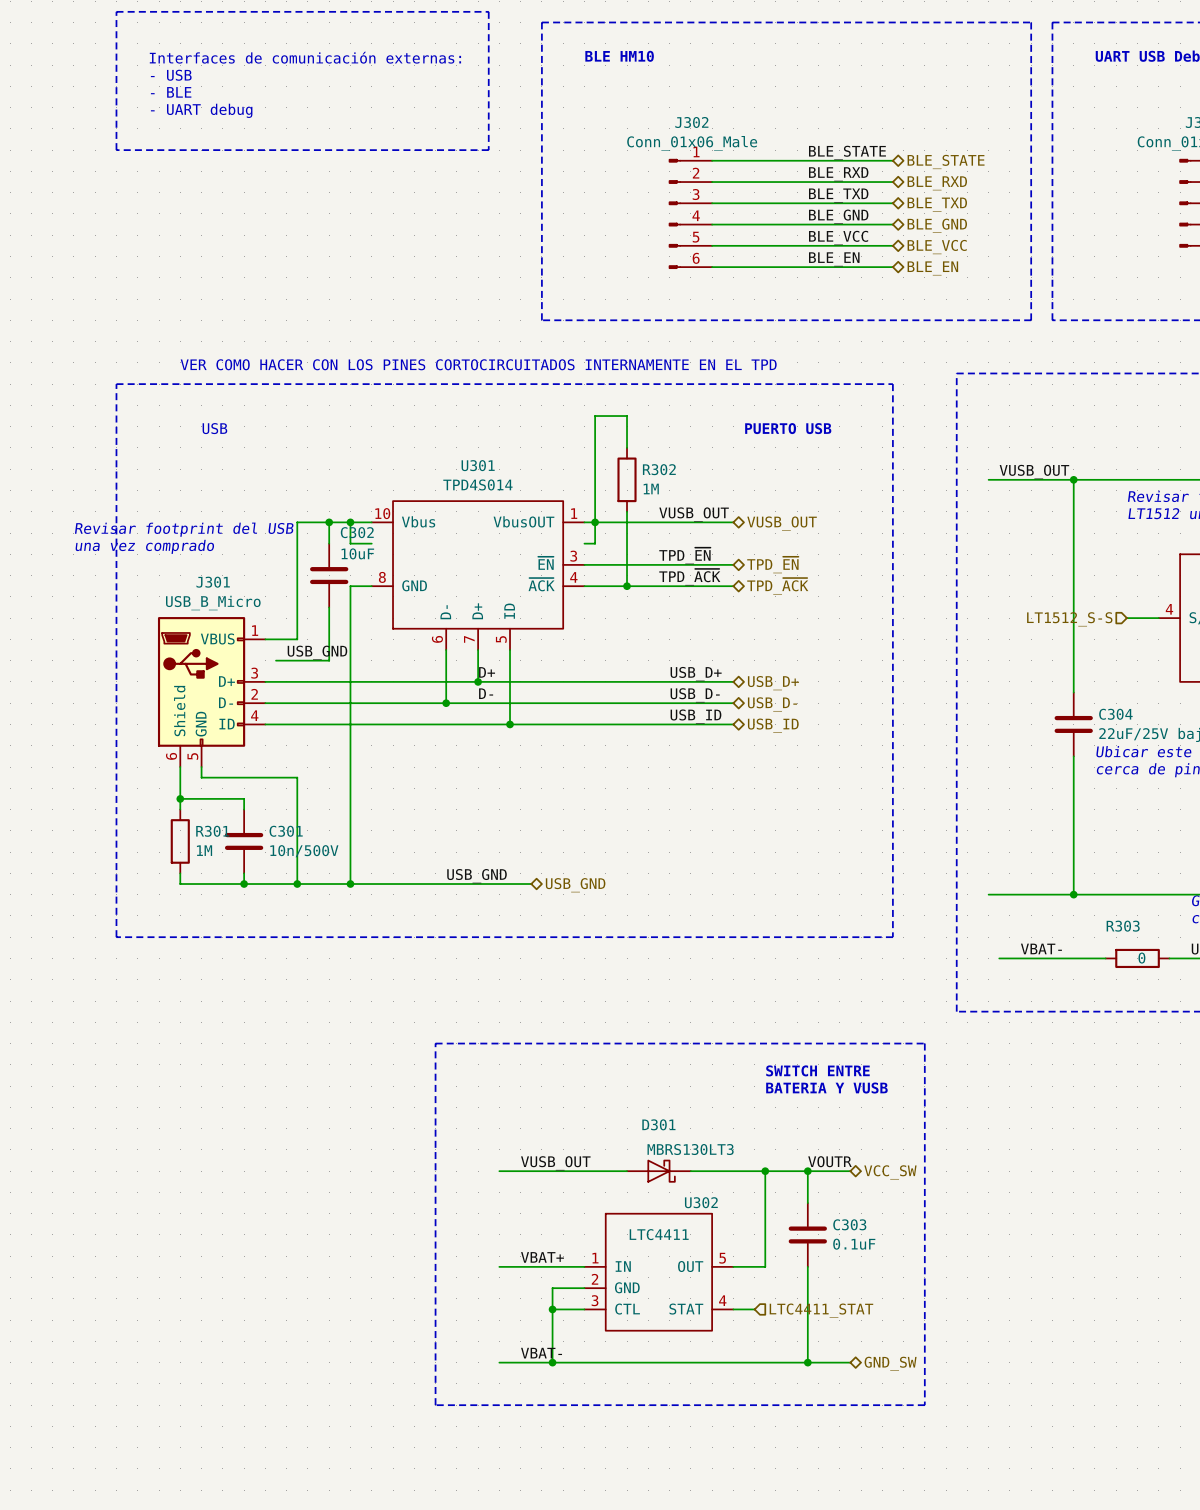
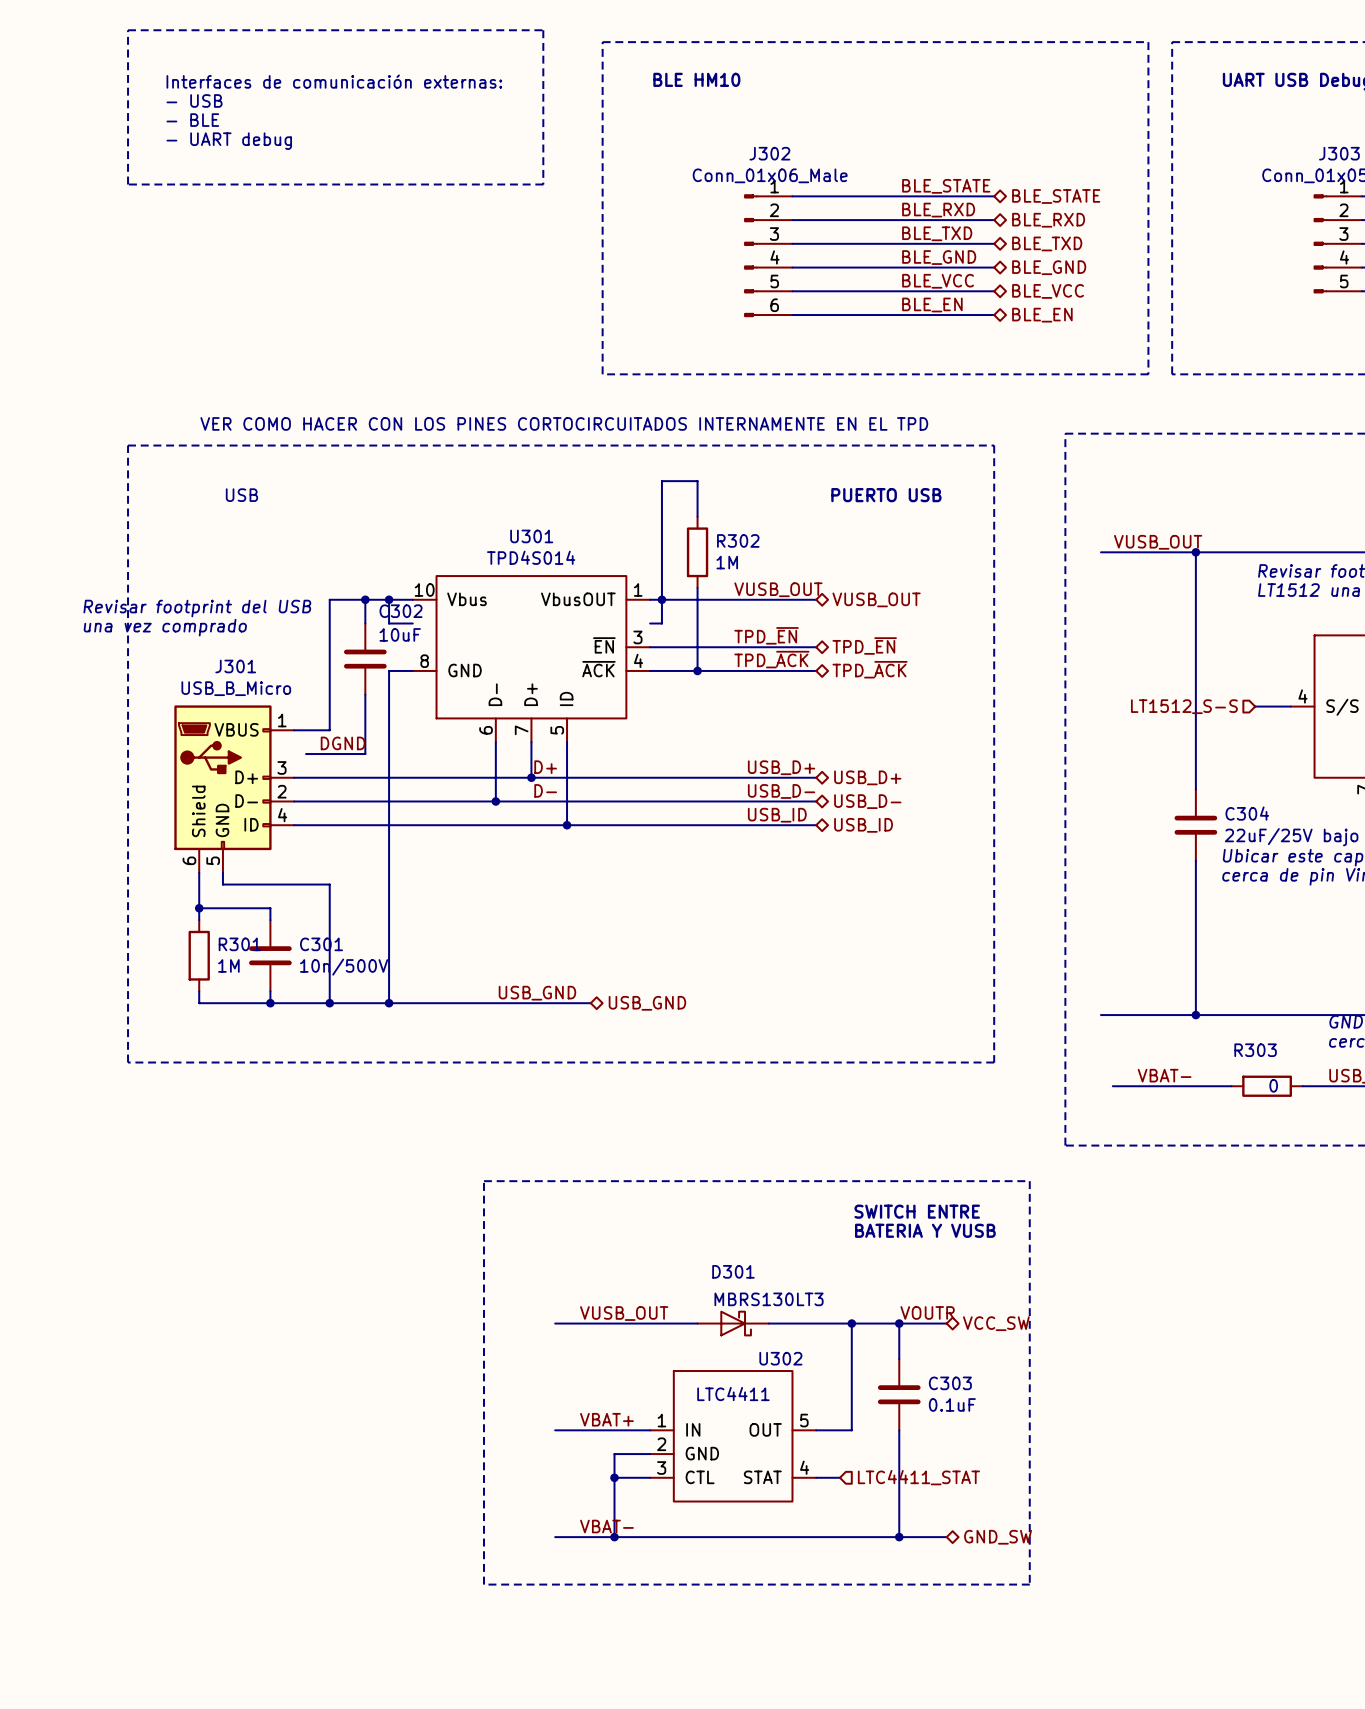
label: USB_GND (317, 652) -> DGND (343, 743)

